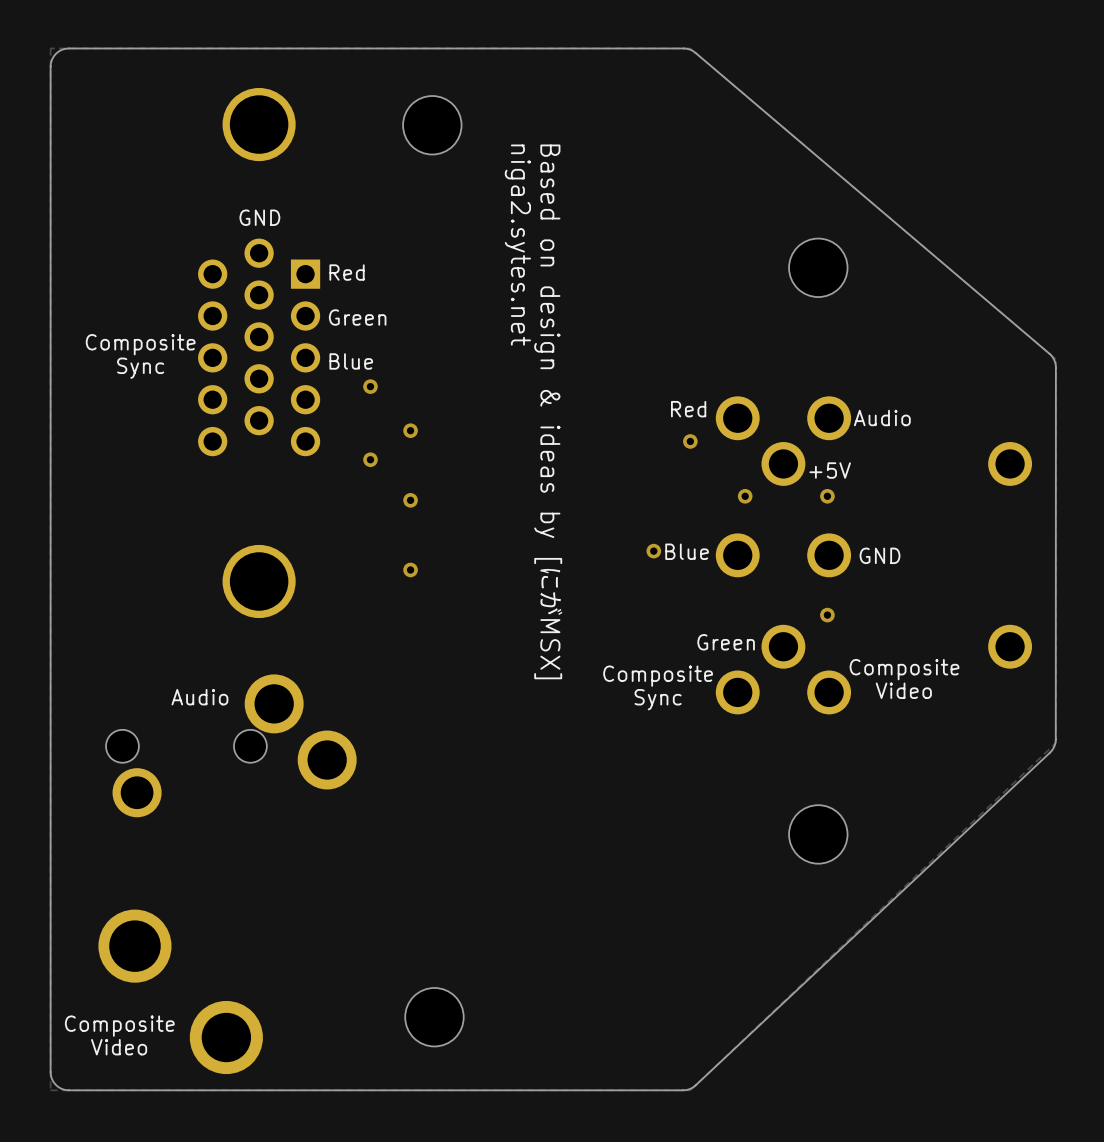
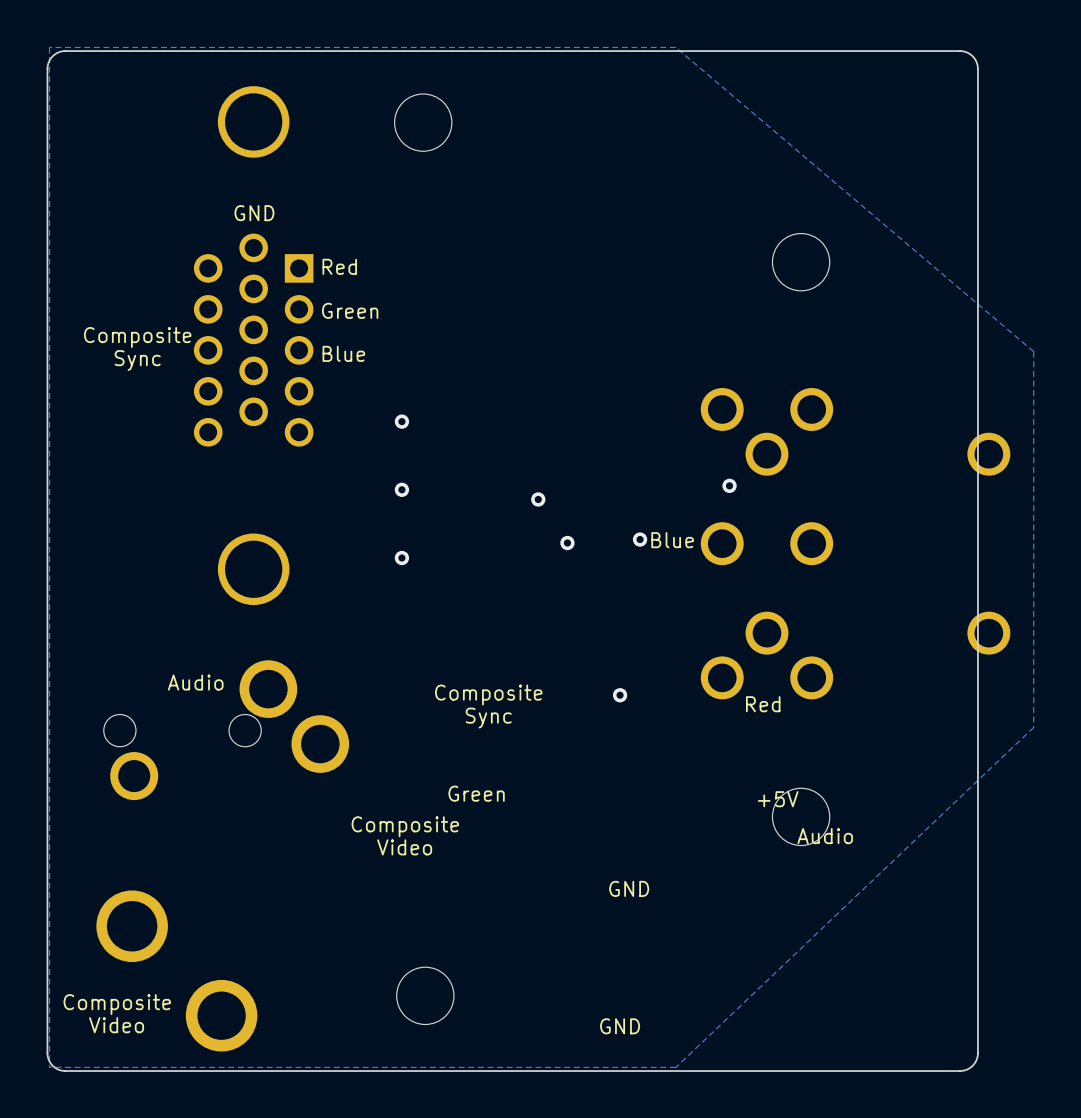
board edge: (683, 48) (68, 48) (59, 51) (53, 57) (50, 66) (50, 1072) (52, 1079) (59, 1087) (68, 1090) (689, 1089) (1053, 748) (1055, 739) (1055, 367) (1054, 359) (1049, 353) (695, 52) (683, 48) -> (960, 51) (972, 56) (977, 68) (977, 1053) (972, 1065) (960, 1071) (65, 1071) (54, 1067) (49, 1060) (47, 1053) (47, 68) (51, 57) (57, 52) (65, 51) (960, 51)
text: niga2.sytes.net (517, 245) -> none
via: (370, 386) -> none
text position: Red (688, 409) -> Red (763, 704)
text: Based on design & ideas by [にがMSX] (548, 411) -> none
text position: Audio (882, 418) -> Audio (825, 836)
via: (690, 441) -> none
via: (370, 459) -> none
text position: +5V (830, 470) -> +5V (778, 799)
via: (827, 496) -> none
via: none -> (538, 499)
via: none -> (567, 543)
text: GND (880, 555) -> none
via: (827, 615) -> none
text position: Green (726, 642) -> Green (476, 793)
text: Composite (904, 669) -> none
text: Composite (658, 676) -> none
text: Video (903, 690) -> none
text position: Sync (658, 699) -> Sync (488, 718)
text: none -> Composite (488, 694)
via: none -> (620, 695)
text: none -> Composite (405, 826)
text: none -> Video (404, 847)
text: none -> GND (629, 888)
text: none -> GND (620, 1026)

